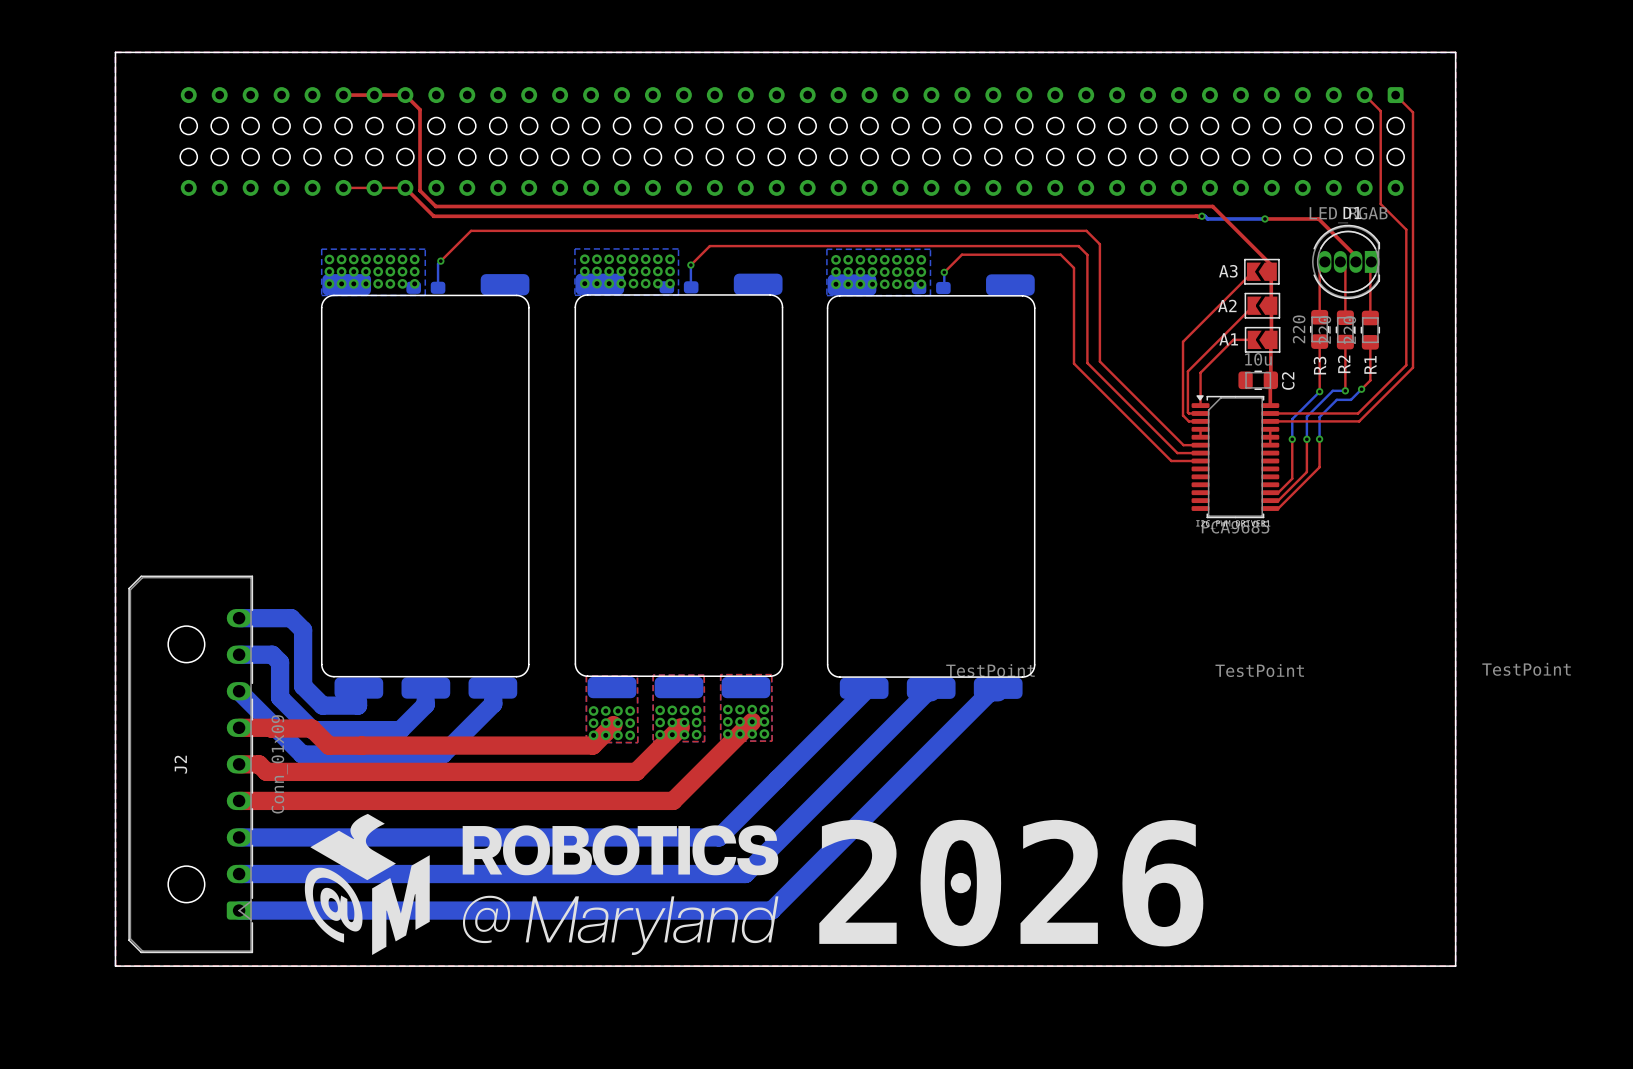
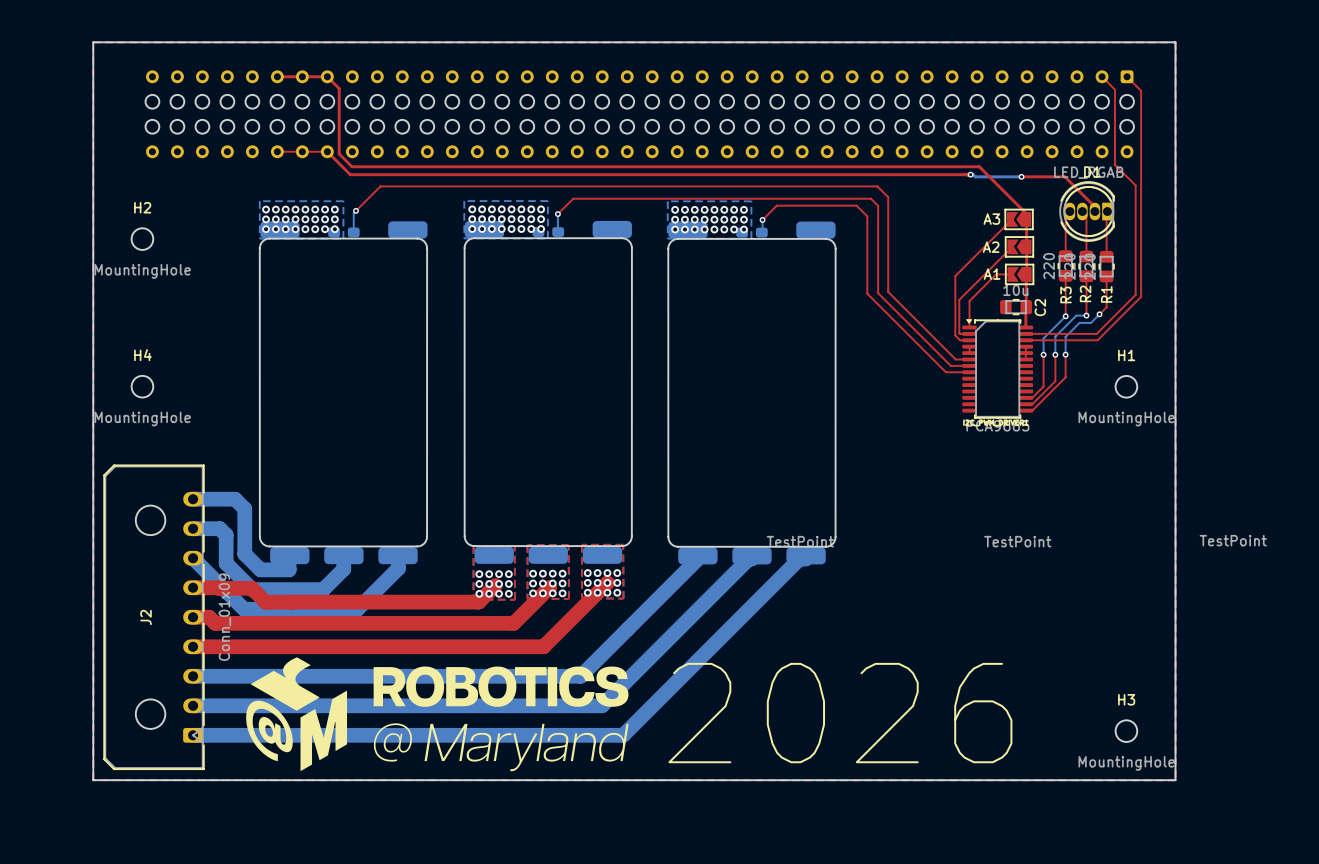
H2: none -> MountingHole (142, 239)
H4: none -> MountingHole (142, 386)
H1: none -> MountingHole (1126, 386)
H3: none -> MountingHole (1126, 731)

